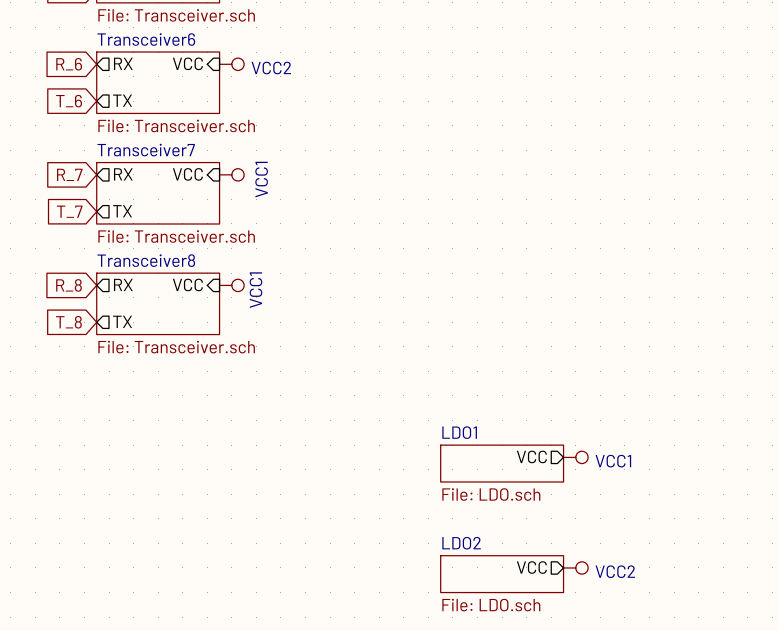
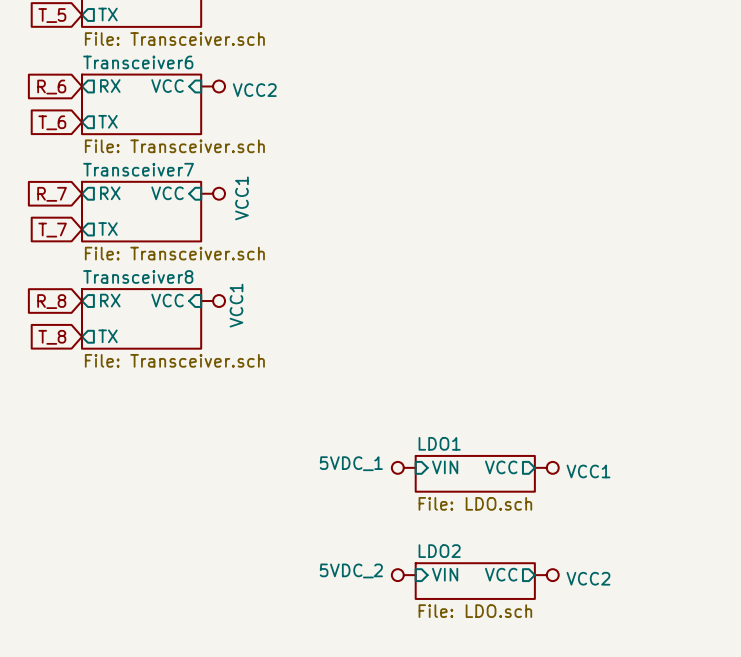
sheet pin: none -> VIN (445, 467)
power symbol: none -> 5VDC_1 (403, 467)
power symbol: none -> 5VDC_2 (403, 575)
sheet pin: none -> VIN (445, 574)

